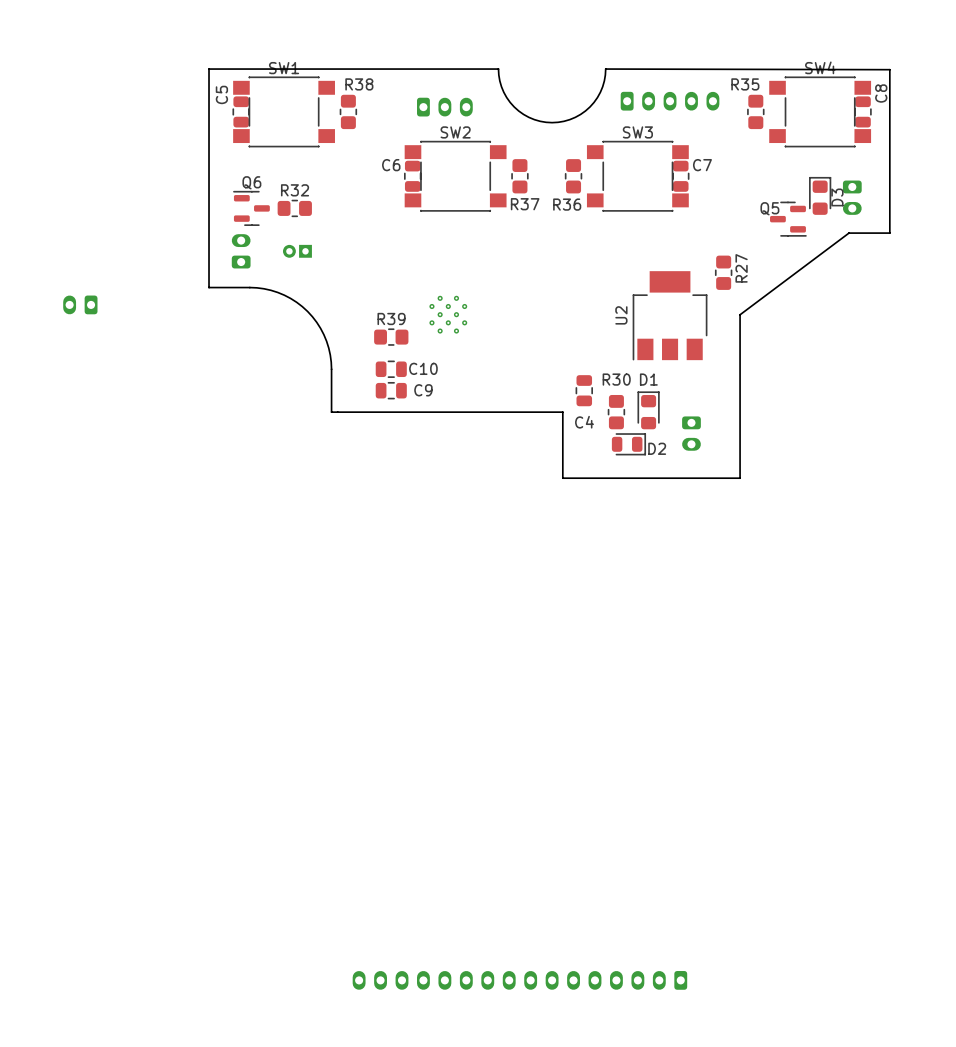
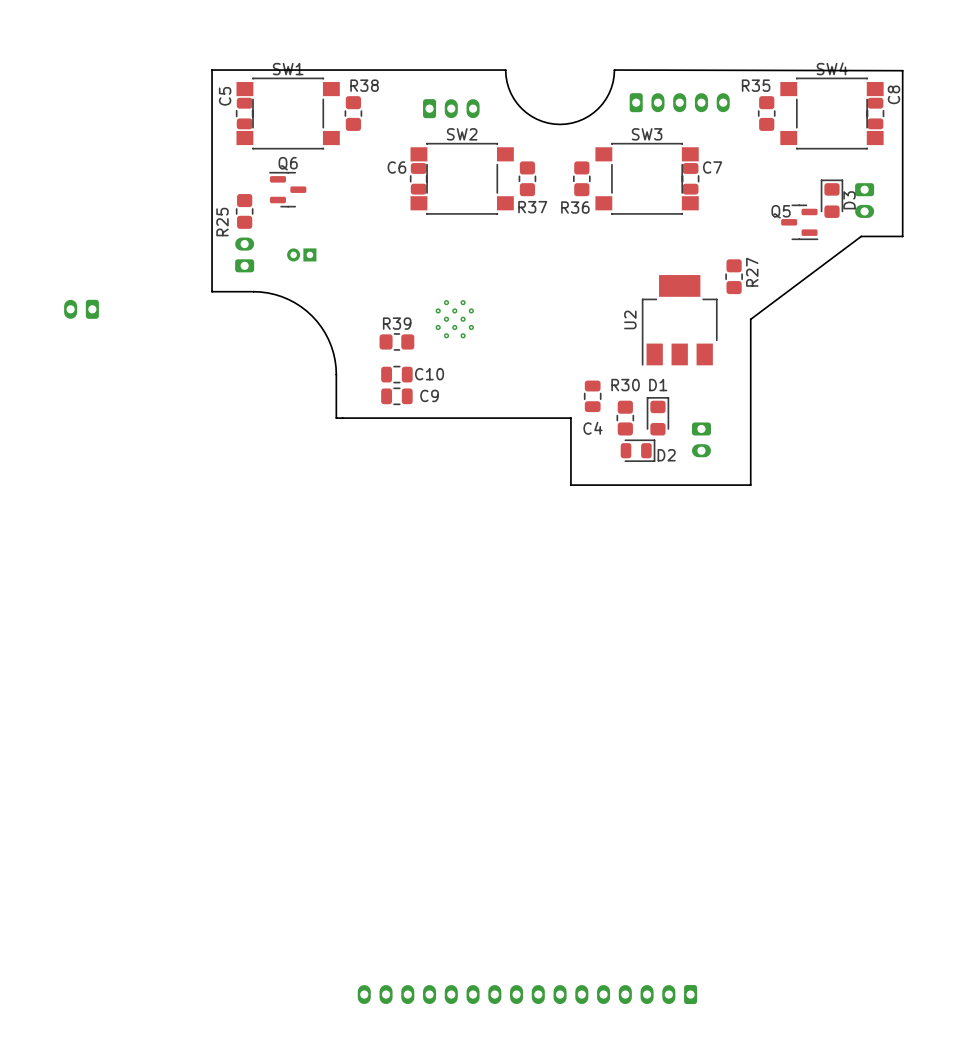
R25: none -> (244, 211)
Q6 position: (251, 208) -> (287, 189)
R32: (294, 208) -> none

